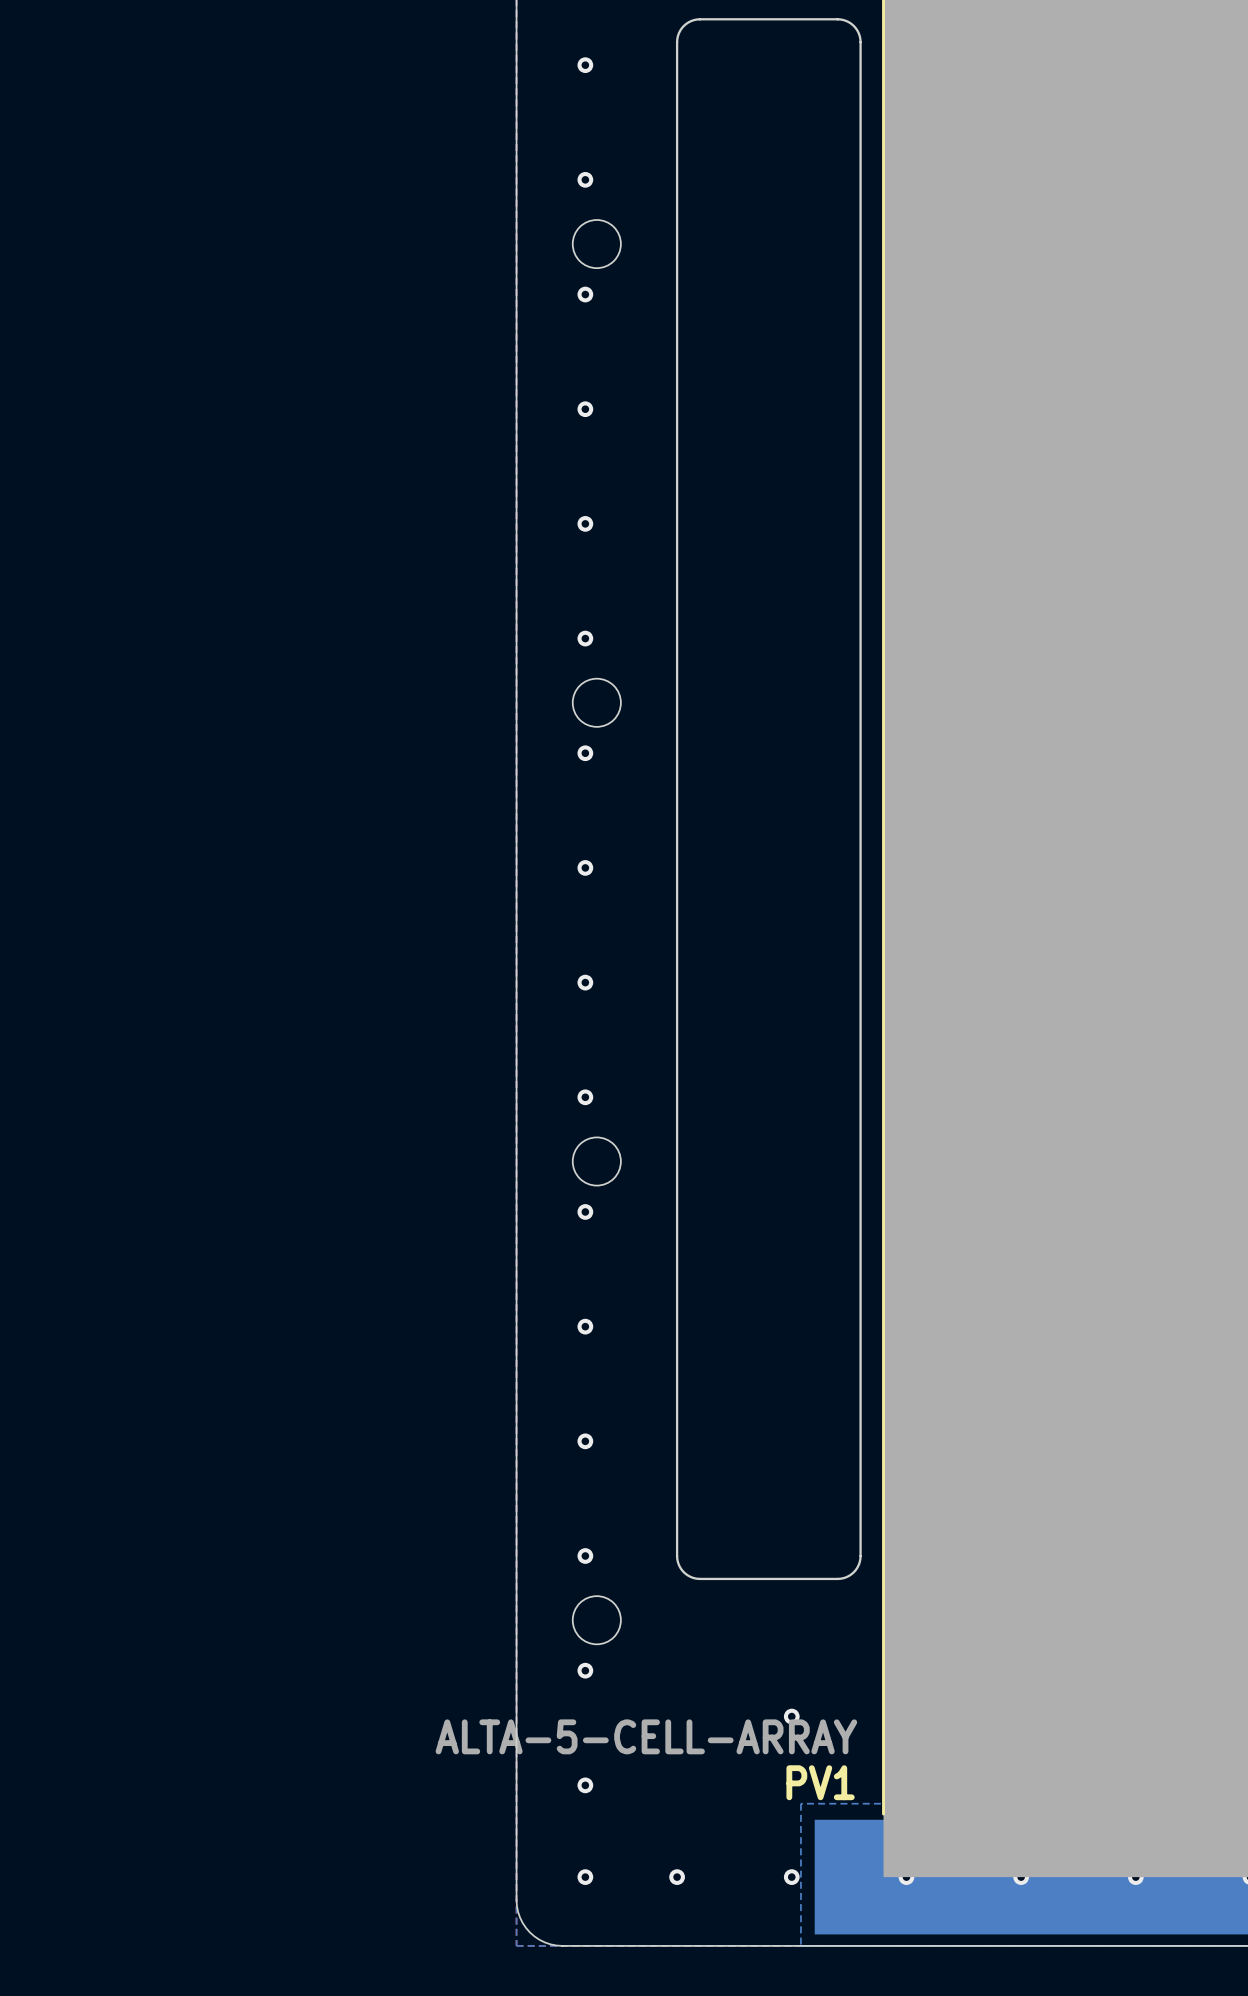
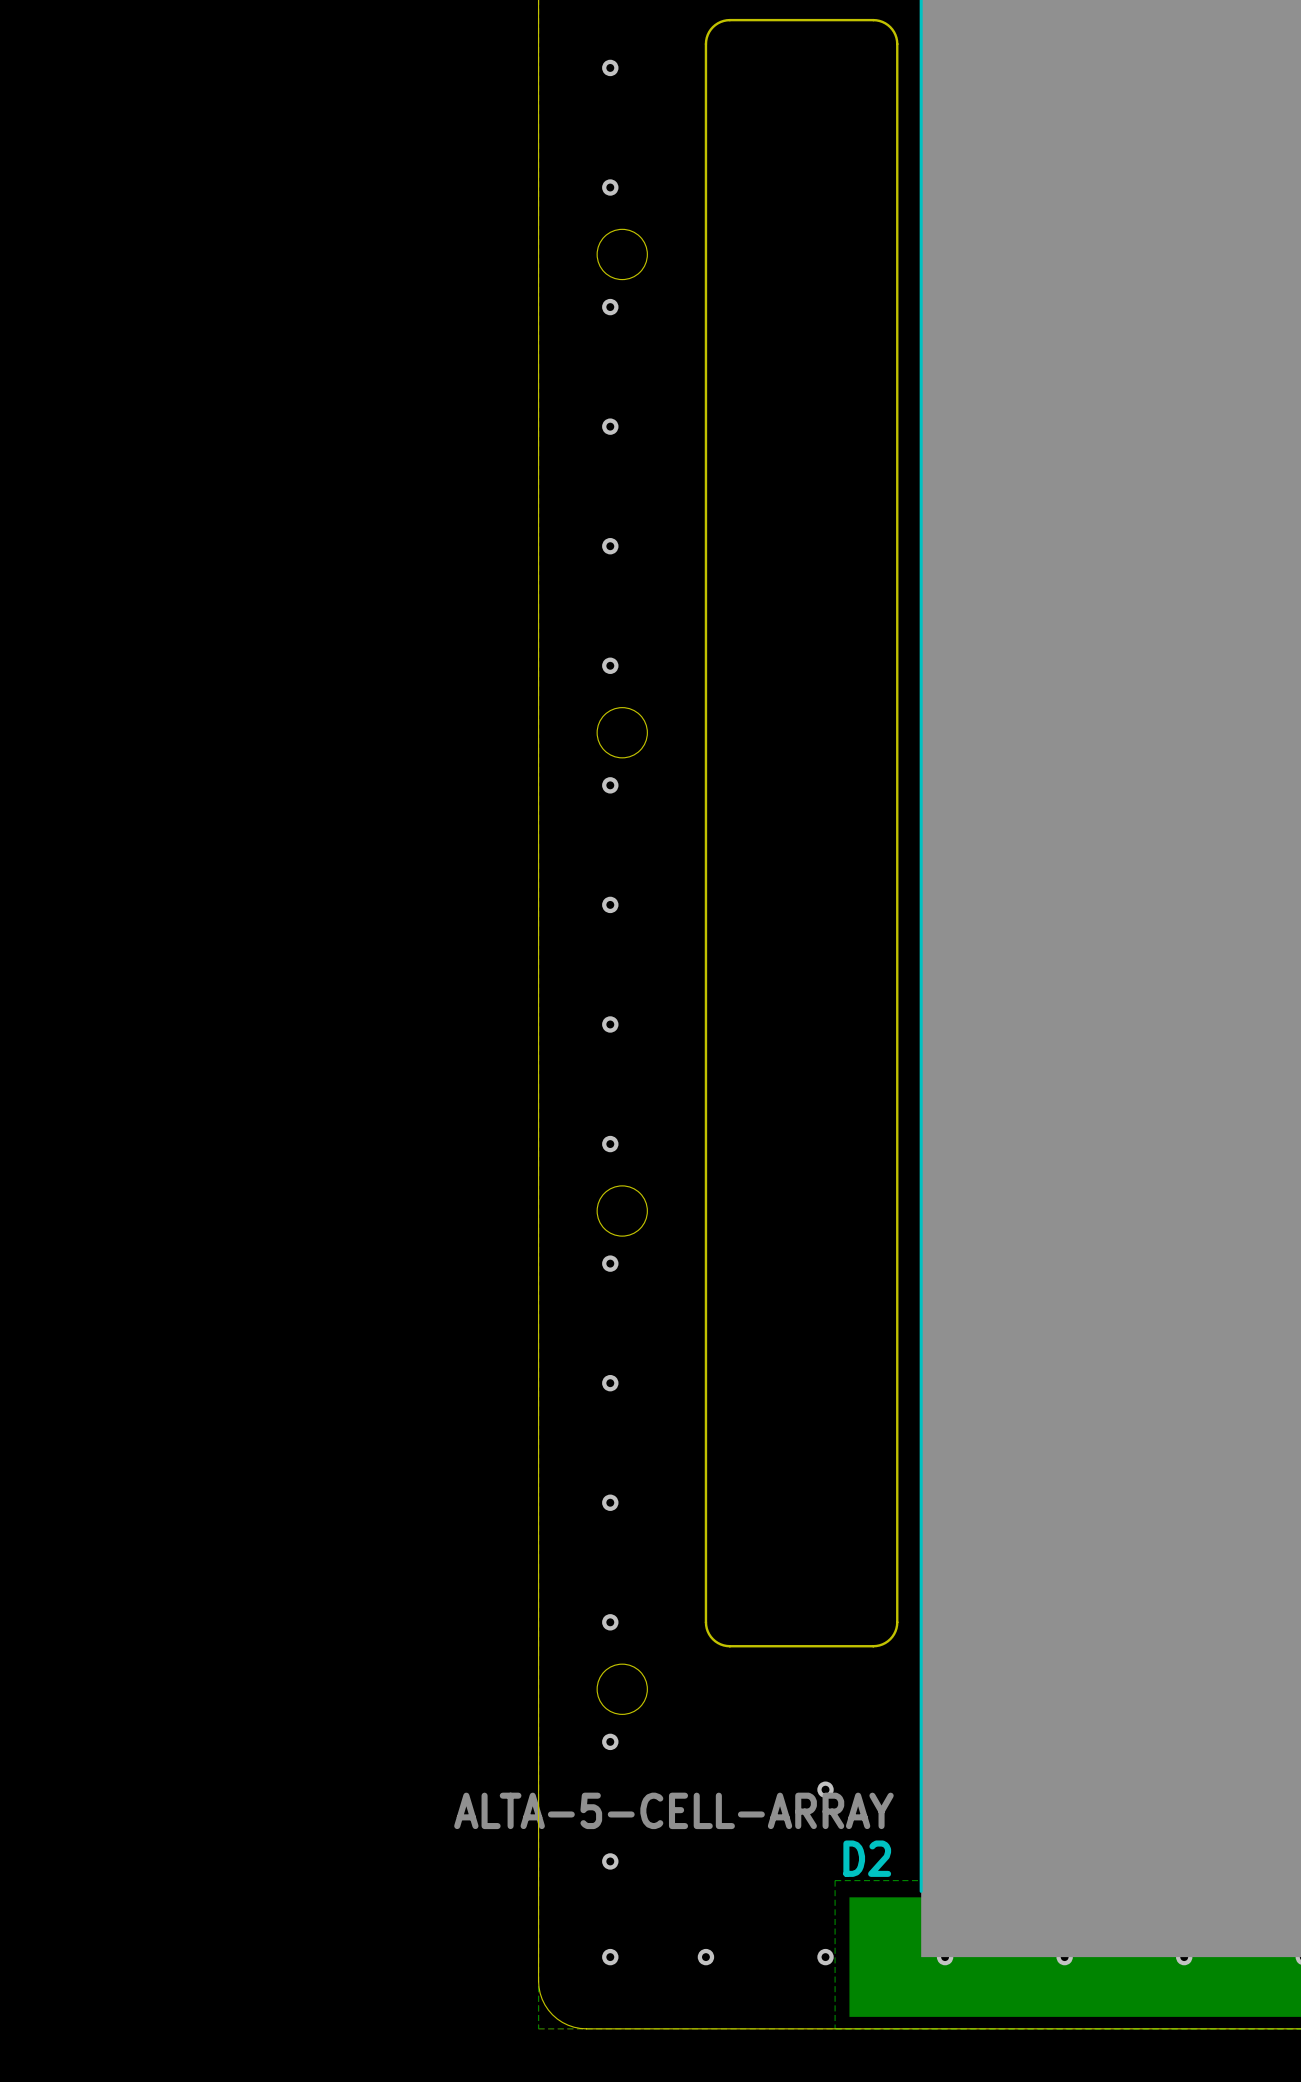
PV1 name: PV1 (820, 1782) -> D2 (867, 1858)

